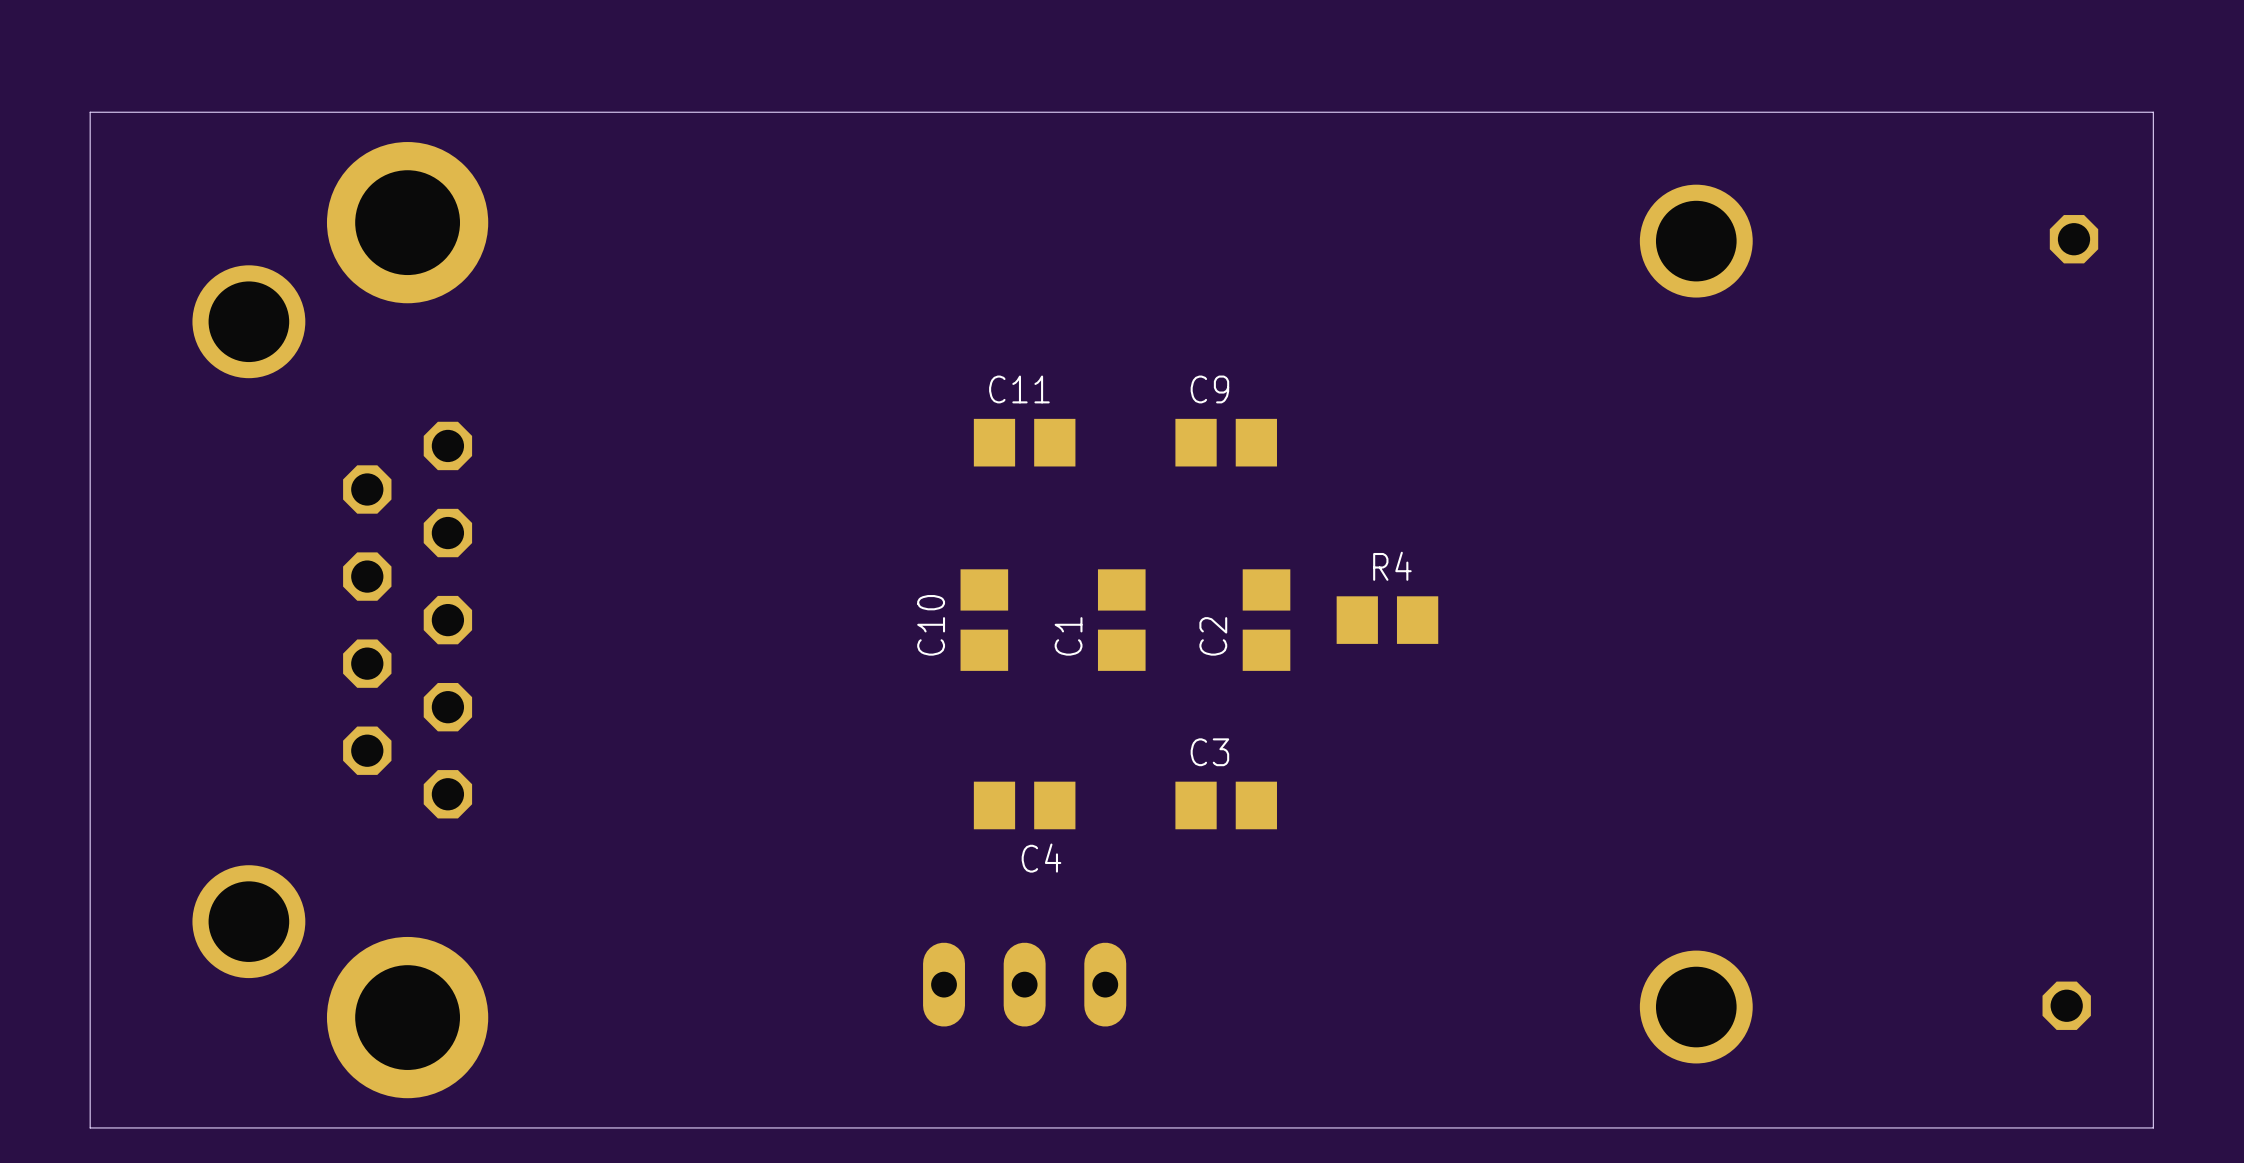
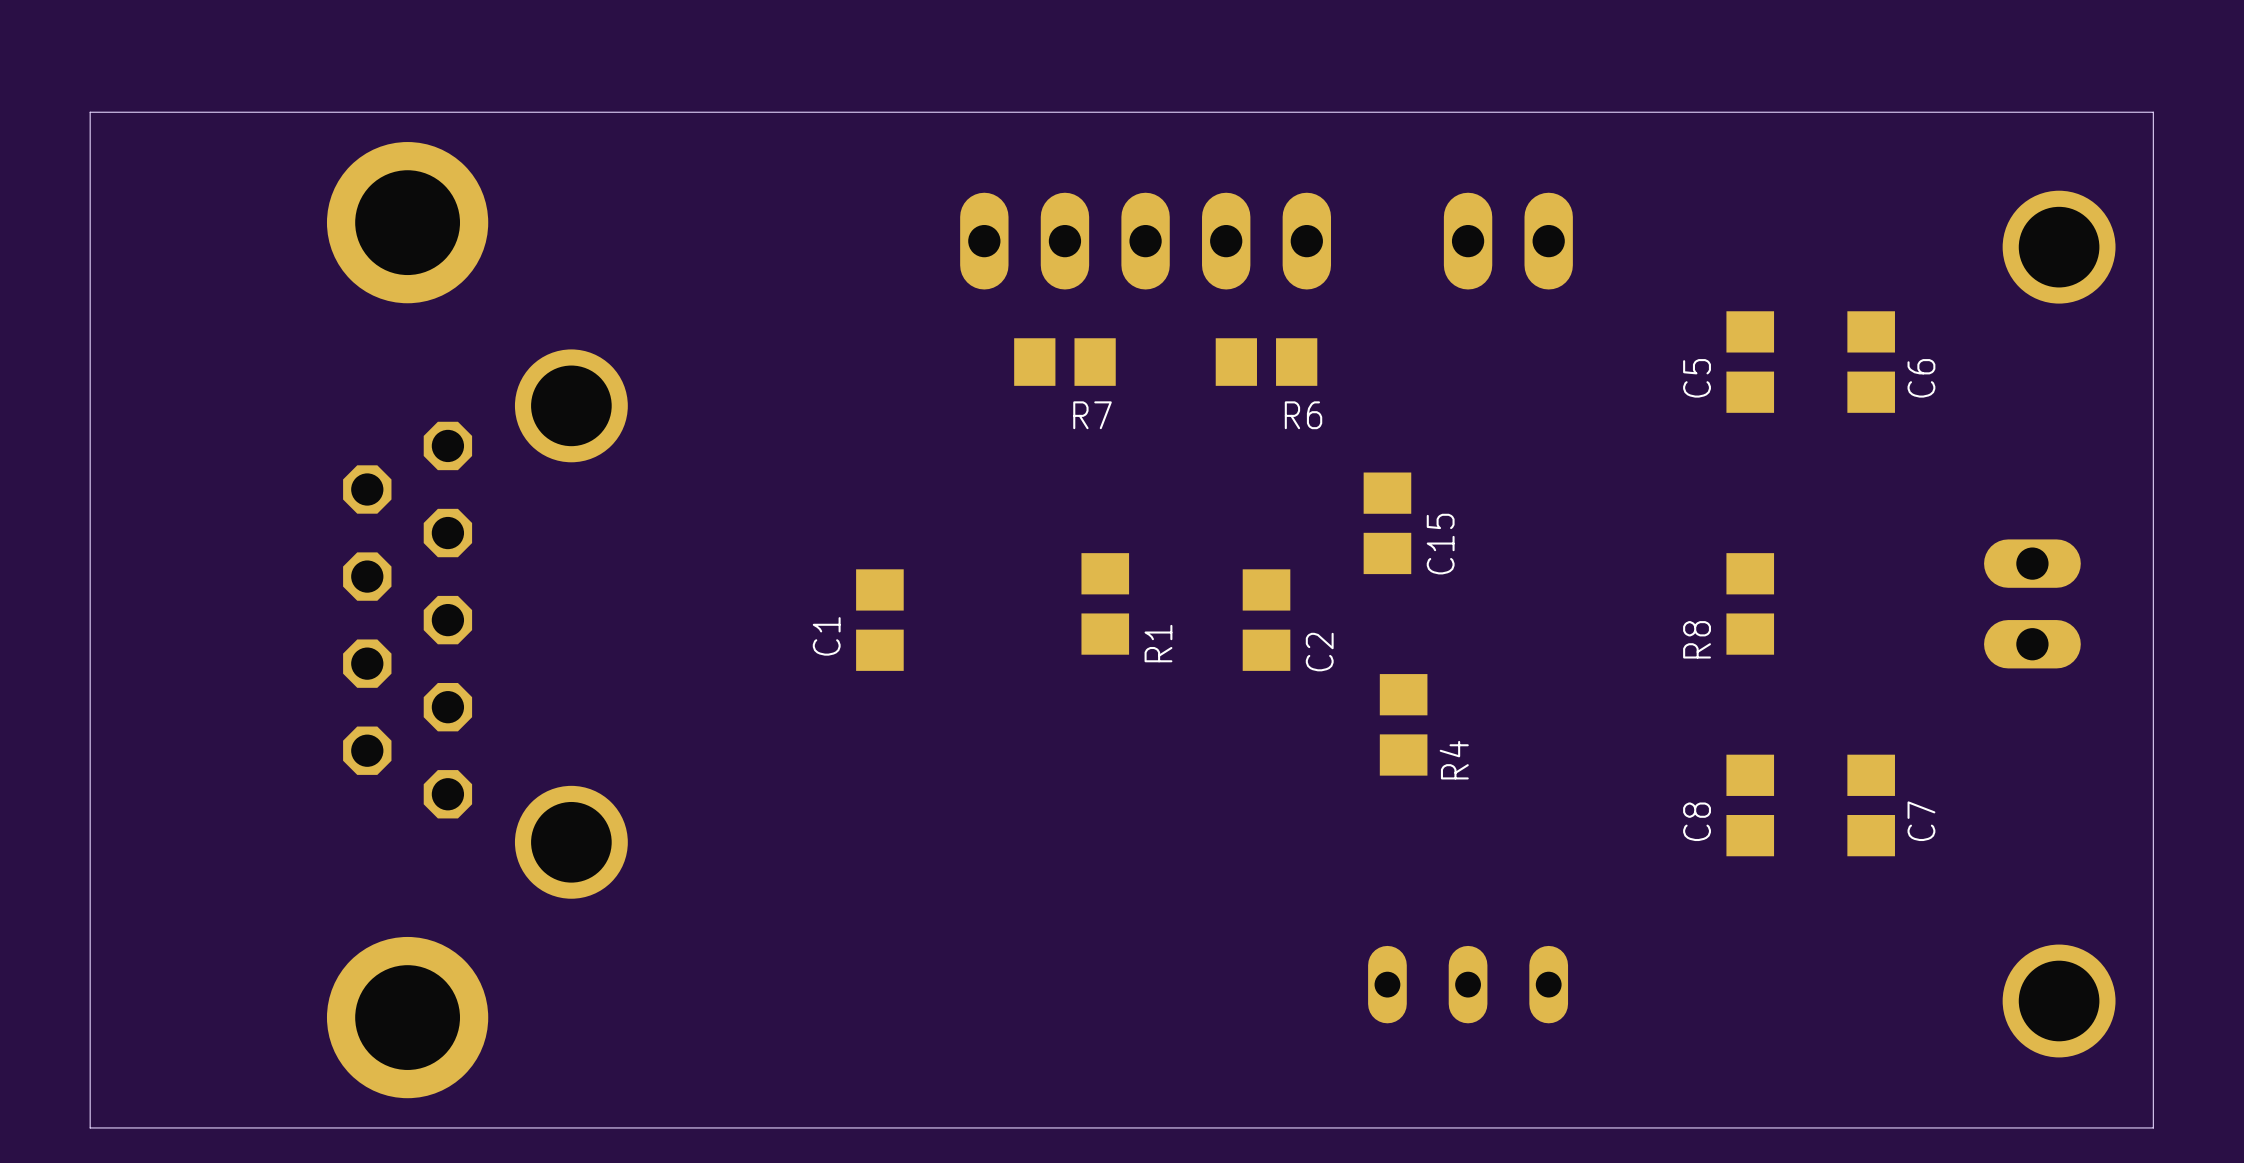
part footprint: [2049, 215, 2099, 264] -> [2002, 190, 2116, 304]
part: none -> (1145, 241)
part: none -> (1508, 241)
part: (1696, 241) -> none
part: (248, 321) -> none
R7: none -> (1064, 362)
R6: none -> (1266, 362)
C5: none -> (1750, 362)
C6: none -> (1871, 362)
part: none -> (571, 405)
C11: (1024, 442) -> none
C9: (1226, 442) -> none
C15: none -> (1387, 523)
R1: none -> (1105, 603)
R8: none -> (1750, 603)
part: none -> (2032, 603)
C10: (984, 620) -> none
C1 position: (1121, 620) -> (879, 620)
R4 rotation: 0° (1387, 620) -> 90° clockwise (1403, 724)
R4 position: (1387, 620) -> (1403, 724)
C2 name position: C2 (1213, 636) -> C2 (1319, 652)
C4: (1024, 805) -> none
C3: (1226, 805) -> none
C8: none -> (1750, 805)
C7: none -> (1871, 805)
part: none -> (571, 842)
part: (248, 921) -> none
part footprint: [2042, 981, 2091, 1030] -> [2002, 944, 2116, 1058]
part: (1024, 984) -> none
part: none -> (1468, 984)
part: (1696, 1007) -> none

